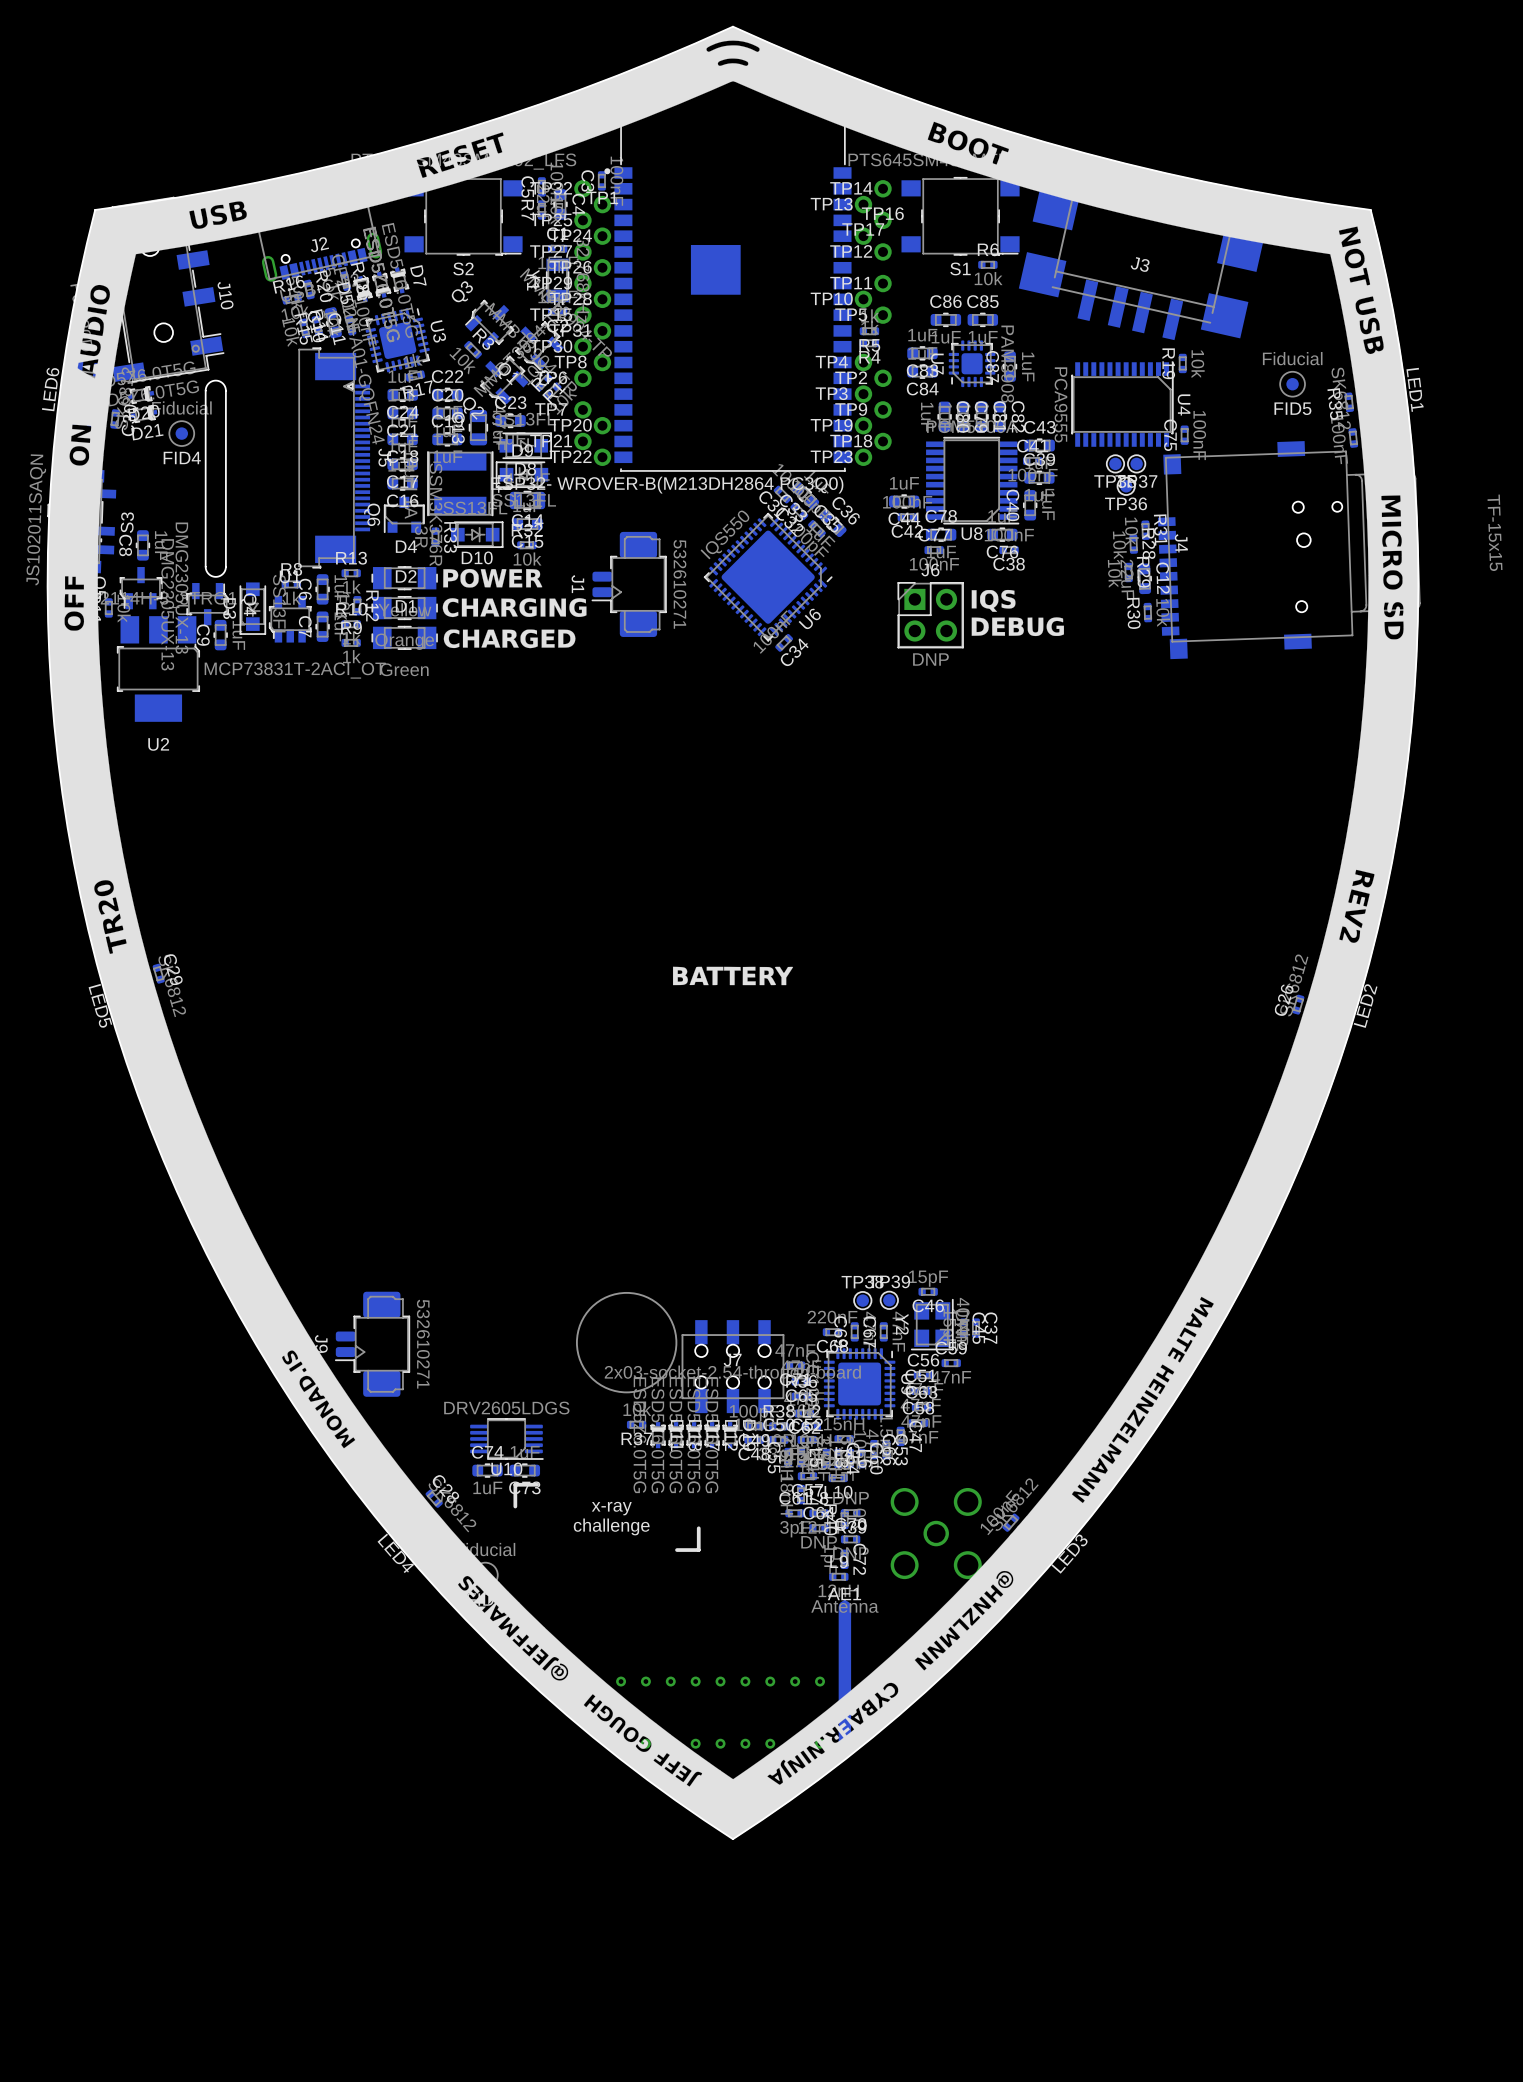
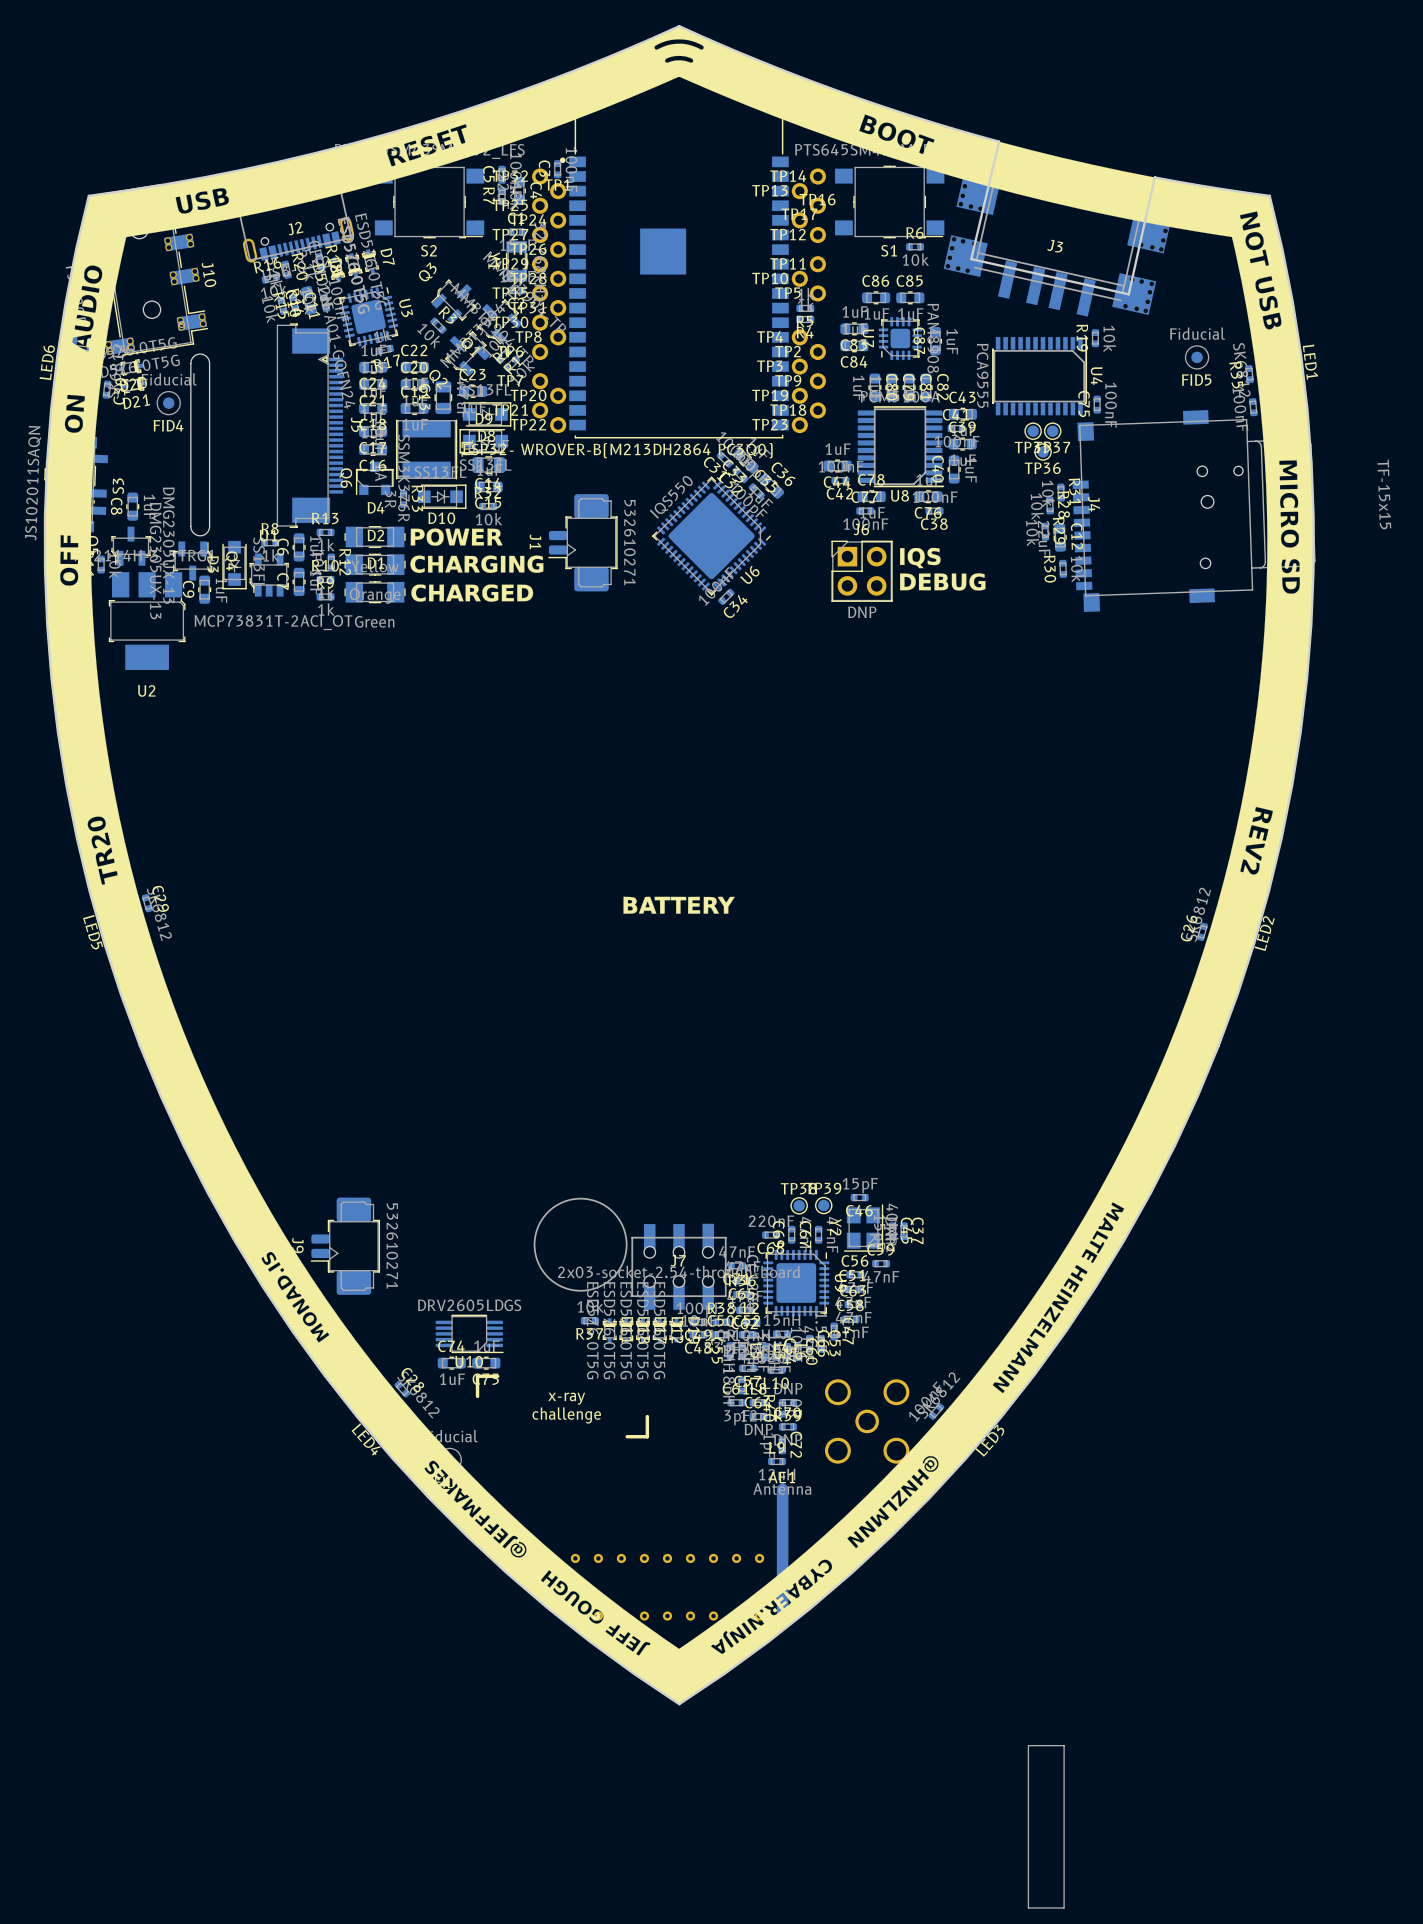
board edge: (732, 26) (809, 59) (886, 90) (965, 117) (1045, 142) (1125, 163) (1206, 182) (1288, 197) (1370, 209) (1393, 311) (1404, 379) (1414, 482) (1418, 586) (1416, 655) (1407, 759) (1398, 827) (1377, 929) (1350, 1029) (1327, 1095) (1288, 1191) (1243, 1285) (1191, 1374) (1153, 1432) (1091, 1516) (1023, 1594) (975, 1644) (899, 1715) (818, 1780) (732, 1839) (647, 1780) (566, 1715) (490, 1644) (442, 1594) (374, 1516) (332, 1461) (274, 1374) (222, 1285) (176, 1191) (138, 1095) (115, 1029) (88, 929) (67, 828) (57, 759) (49, 655) (47, 586) (50, 482) (61, 379) (79, 277) (95, 209) (177, 197) (259, 182) (340, 163) (420, 142) (500, 117) (579, 90) (656, 59) (732, 26) -> (679, 26) (644, 41) (608, 56) (536, 85) (390, 133) (240, 170) (88, 195) (76, 248) (57, 355) (51, 409) (44, 517) (47, 624) (57, 732) (76, 838) (89, 890) (120, 994) (139, 1045) (160, 1095) (208, 1193) (234, 1240) (292, 1331) (357, 1417) (429, 1498) (506, 1573) (547, 1608) (634, 1673) (679, 1704) (724, 1673) (810, 1608) (851, 1573) (929, 1498) (1001, 1417) (1065, 1331) (1124, 1240) (1150, 1193) (1197, 1095) (1218, 1045) (1237, 994) (1269, 890) (1281, 838) (1300, 732) (1311, 624) (1313, 517) (1307, 409) (1301, 355) (1282, 248) (1269, 195) (1154, 177) (1128, 294) (971, 259) (999, 141) (917, 117) (836, 90) (757, 60) (718, 43) (698, 34) (679, 26)
J3 footprint: [1018, 155, 1265, 341] -> [943, 145, 1172, 317]
J10 footprint: [108, 196, 225, 383] -> [100, 183, 209, 356]
J7 footprint: [681, 1320, 785, 1414] -> [631, 1223, 727, 1310]
drawing: none -> [1027, 1745, 1065, 1909]

